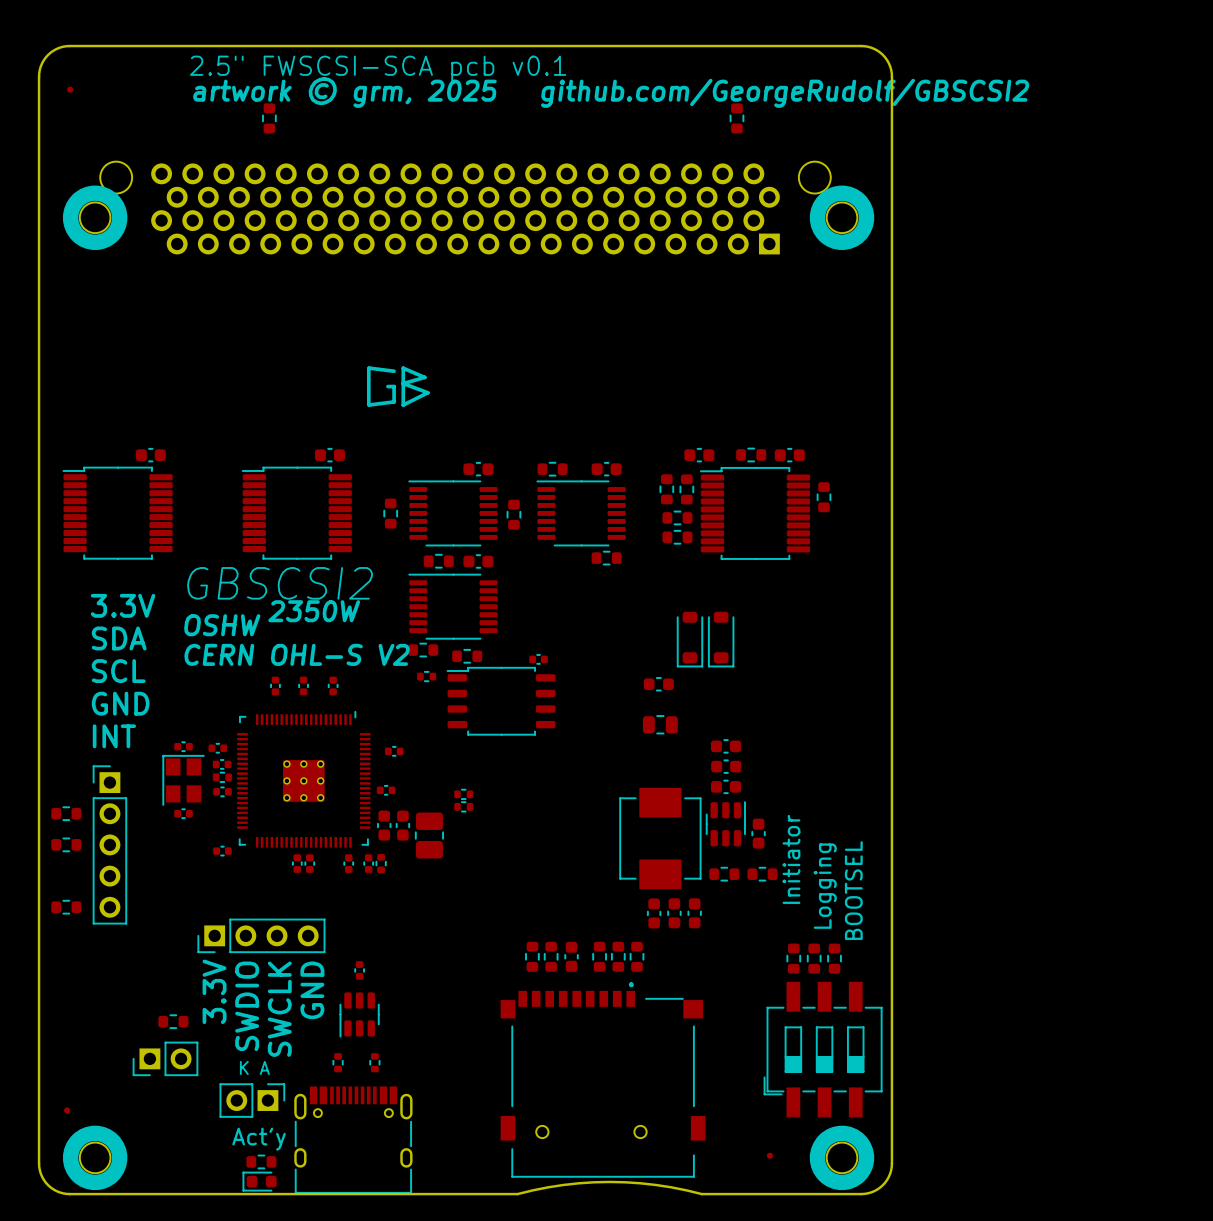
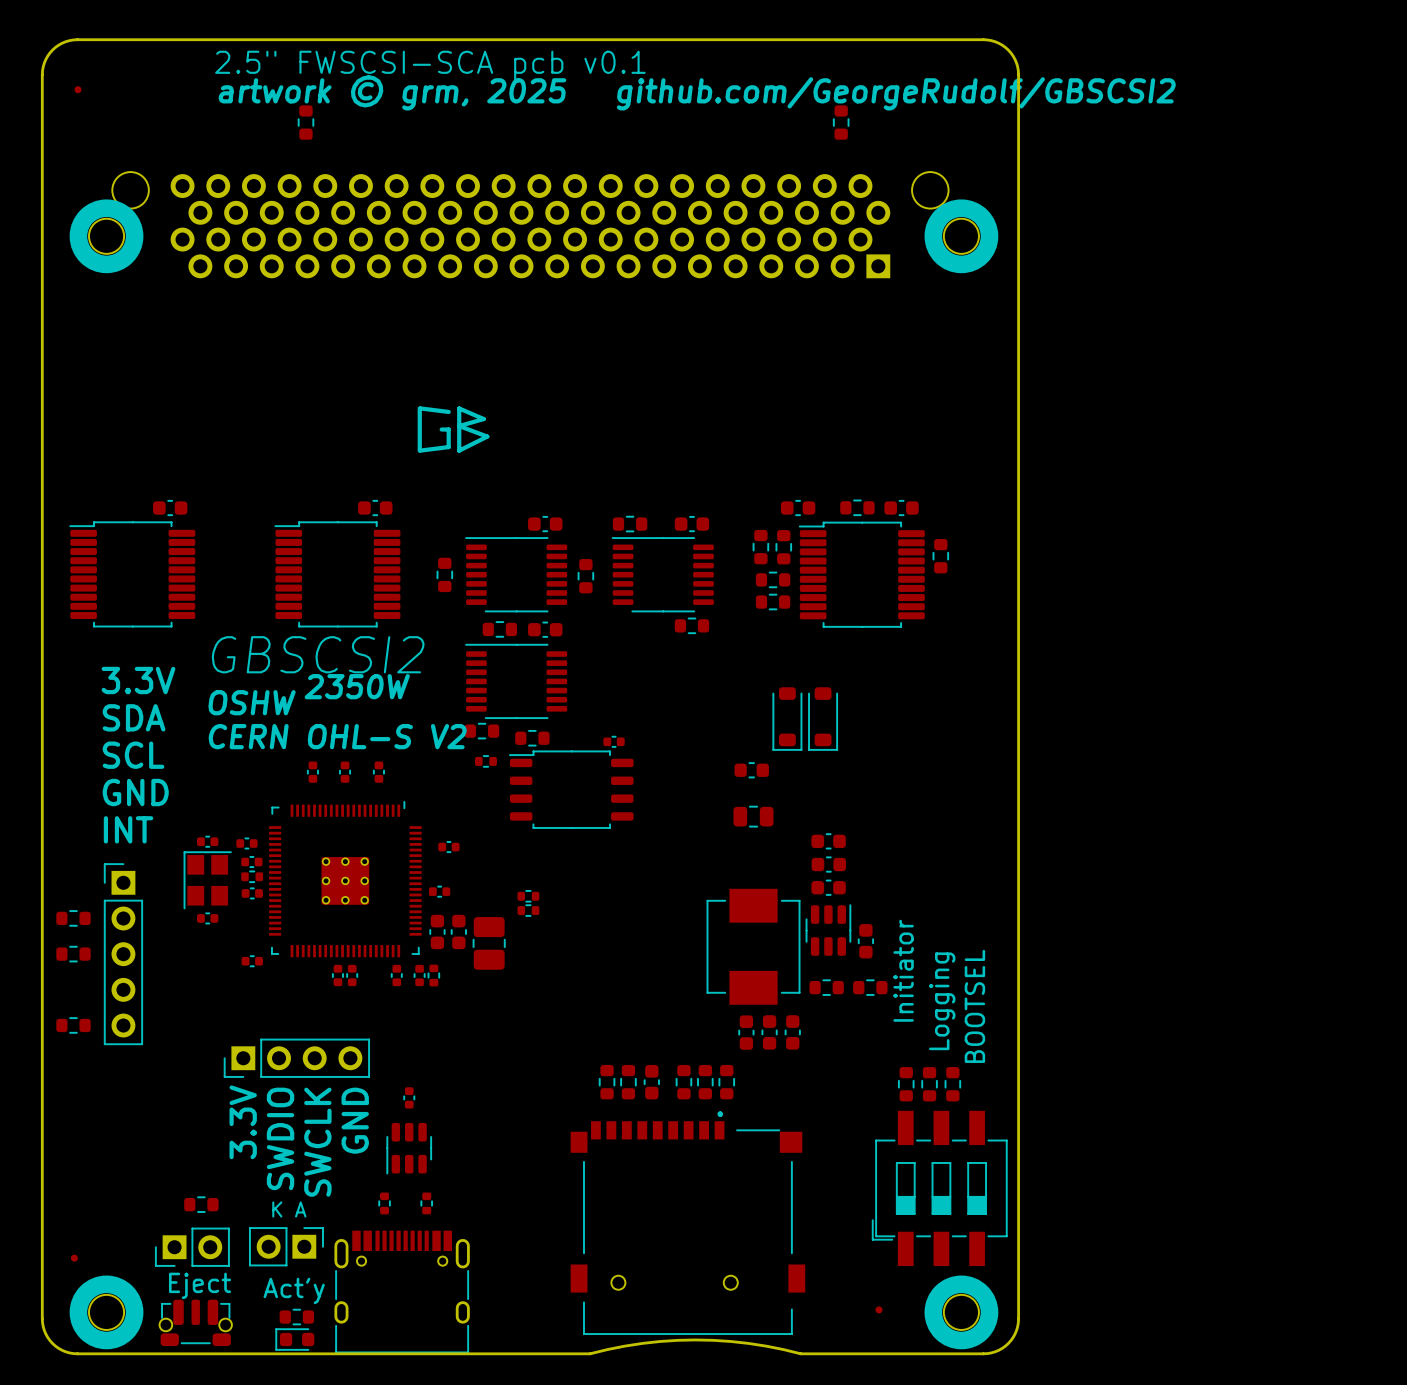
part position: (173, 1021) -> (201, 1204)
part position: (165, 1058) -> (192, 1247)
text: none -> Eject (200, 1285)
part: none -> (195, 1322)

